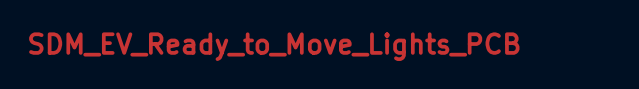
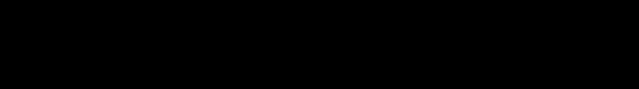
text: SDM_EV_Ready_to_Move_Lights_PCB (274, 46) -> none

